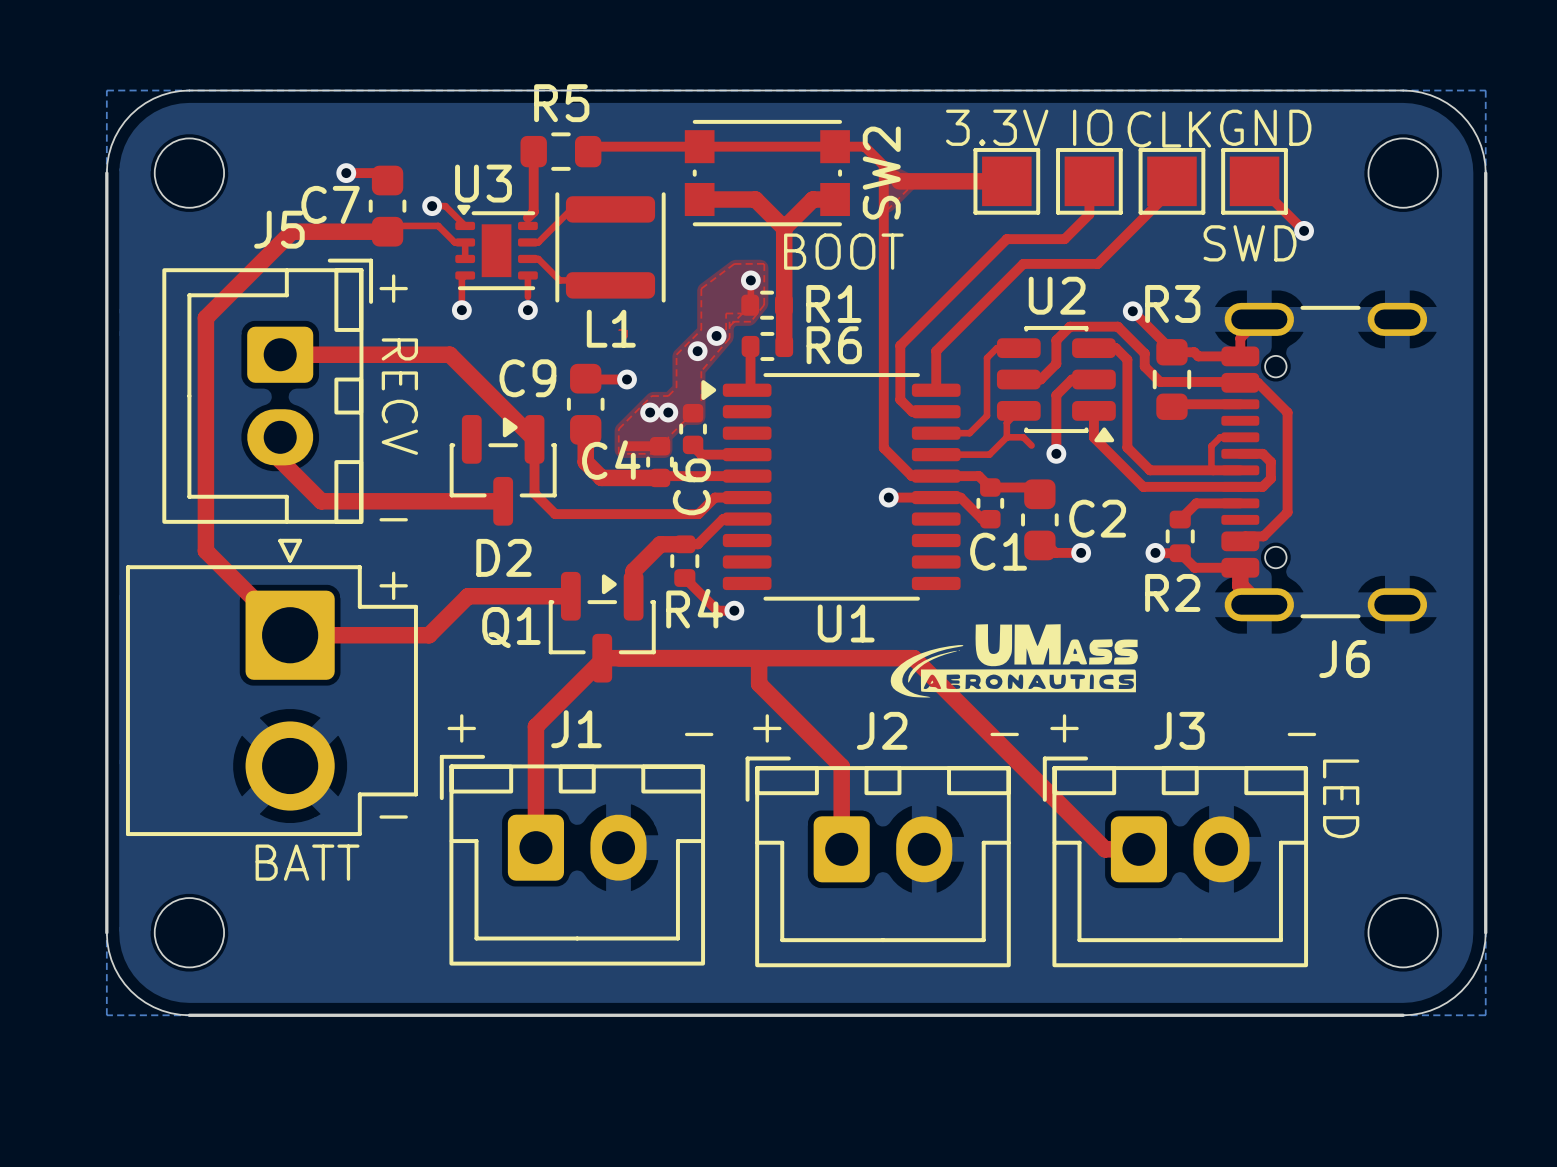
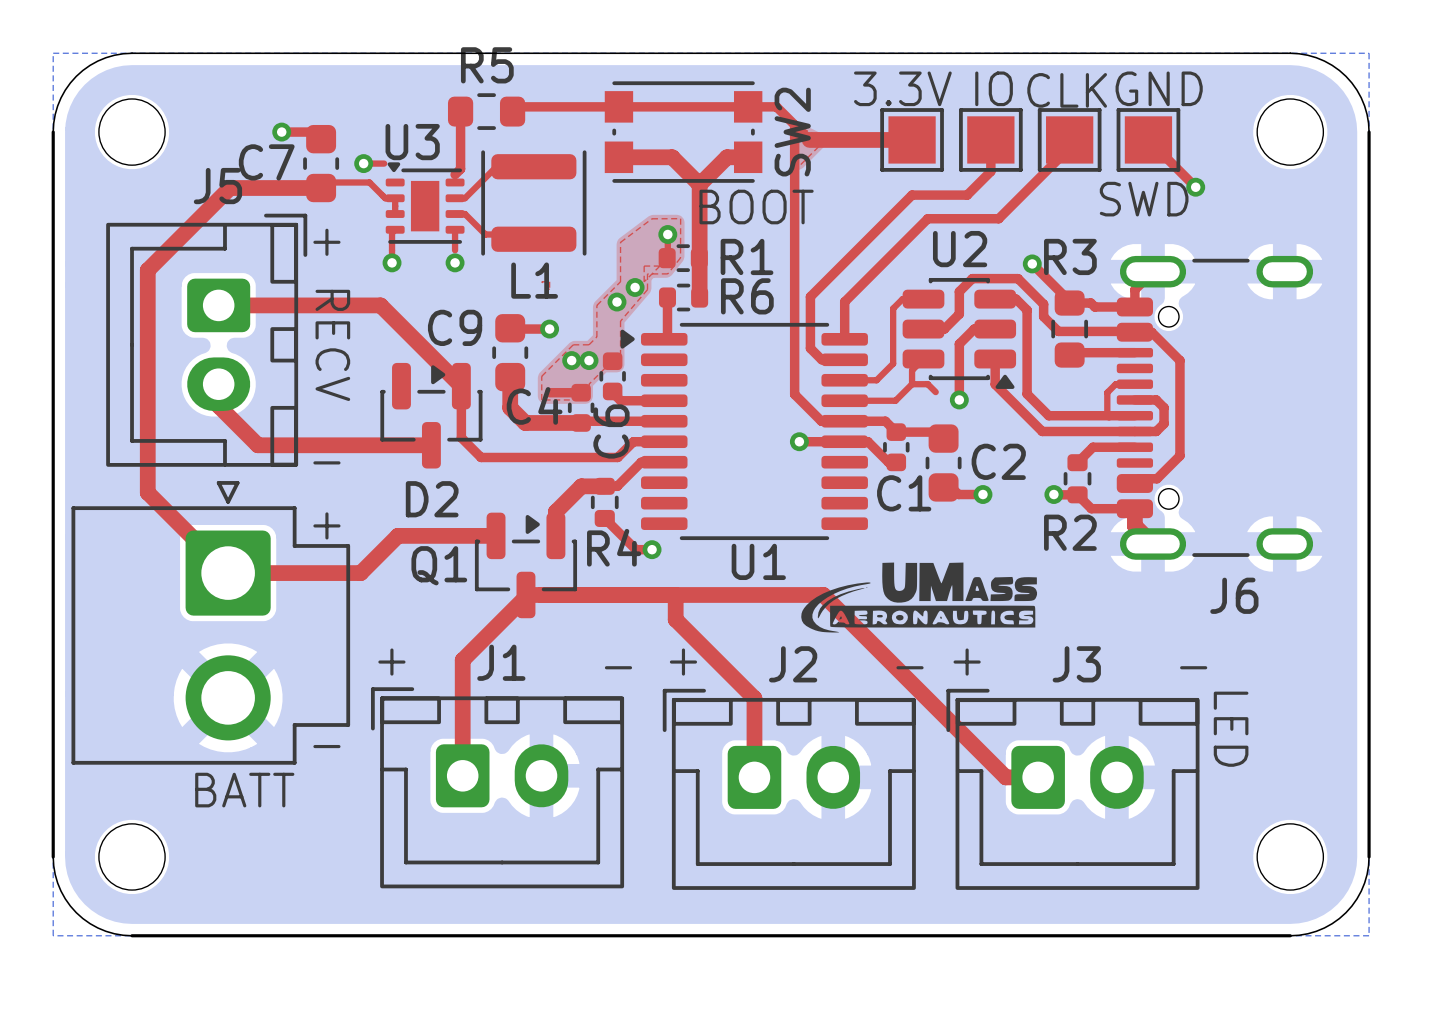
top track: (445, 206) (465, 225) -> (376, 163) (384, 163)

